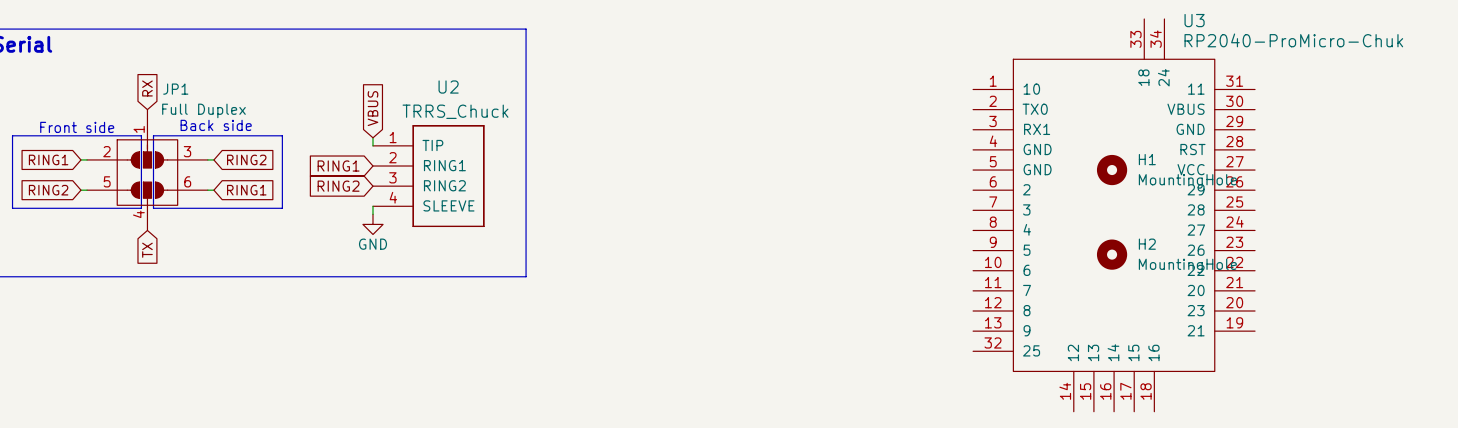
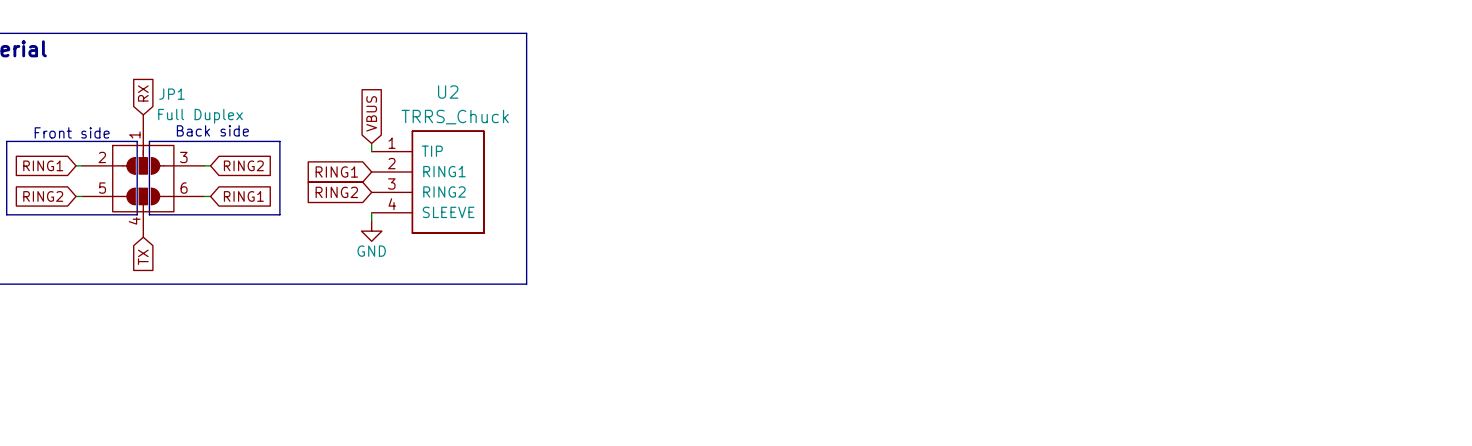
H1: MountingHole (1112, 170) -> none
U3: RP2040-ProMicro-Chuk (1114, 215) -> none
H2: MountingHole (1112, 254) -> none

